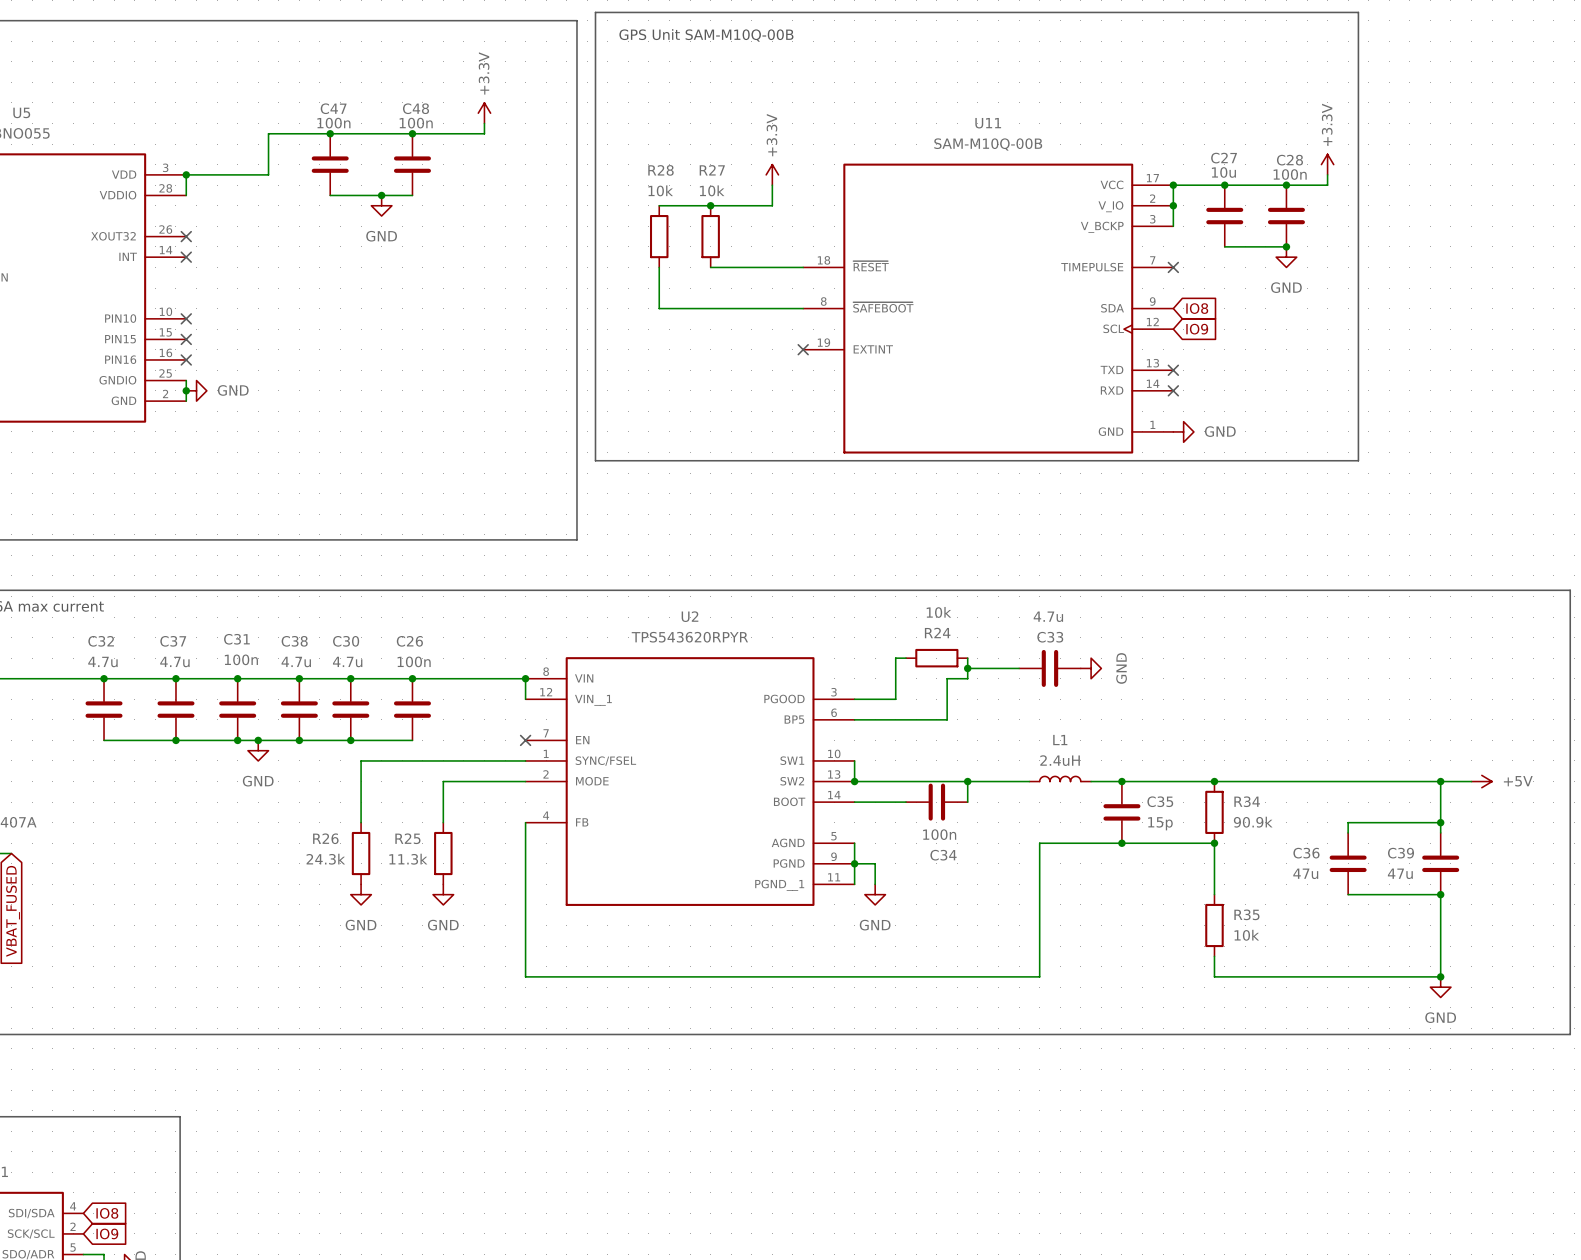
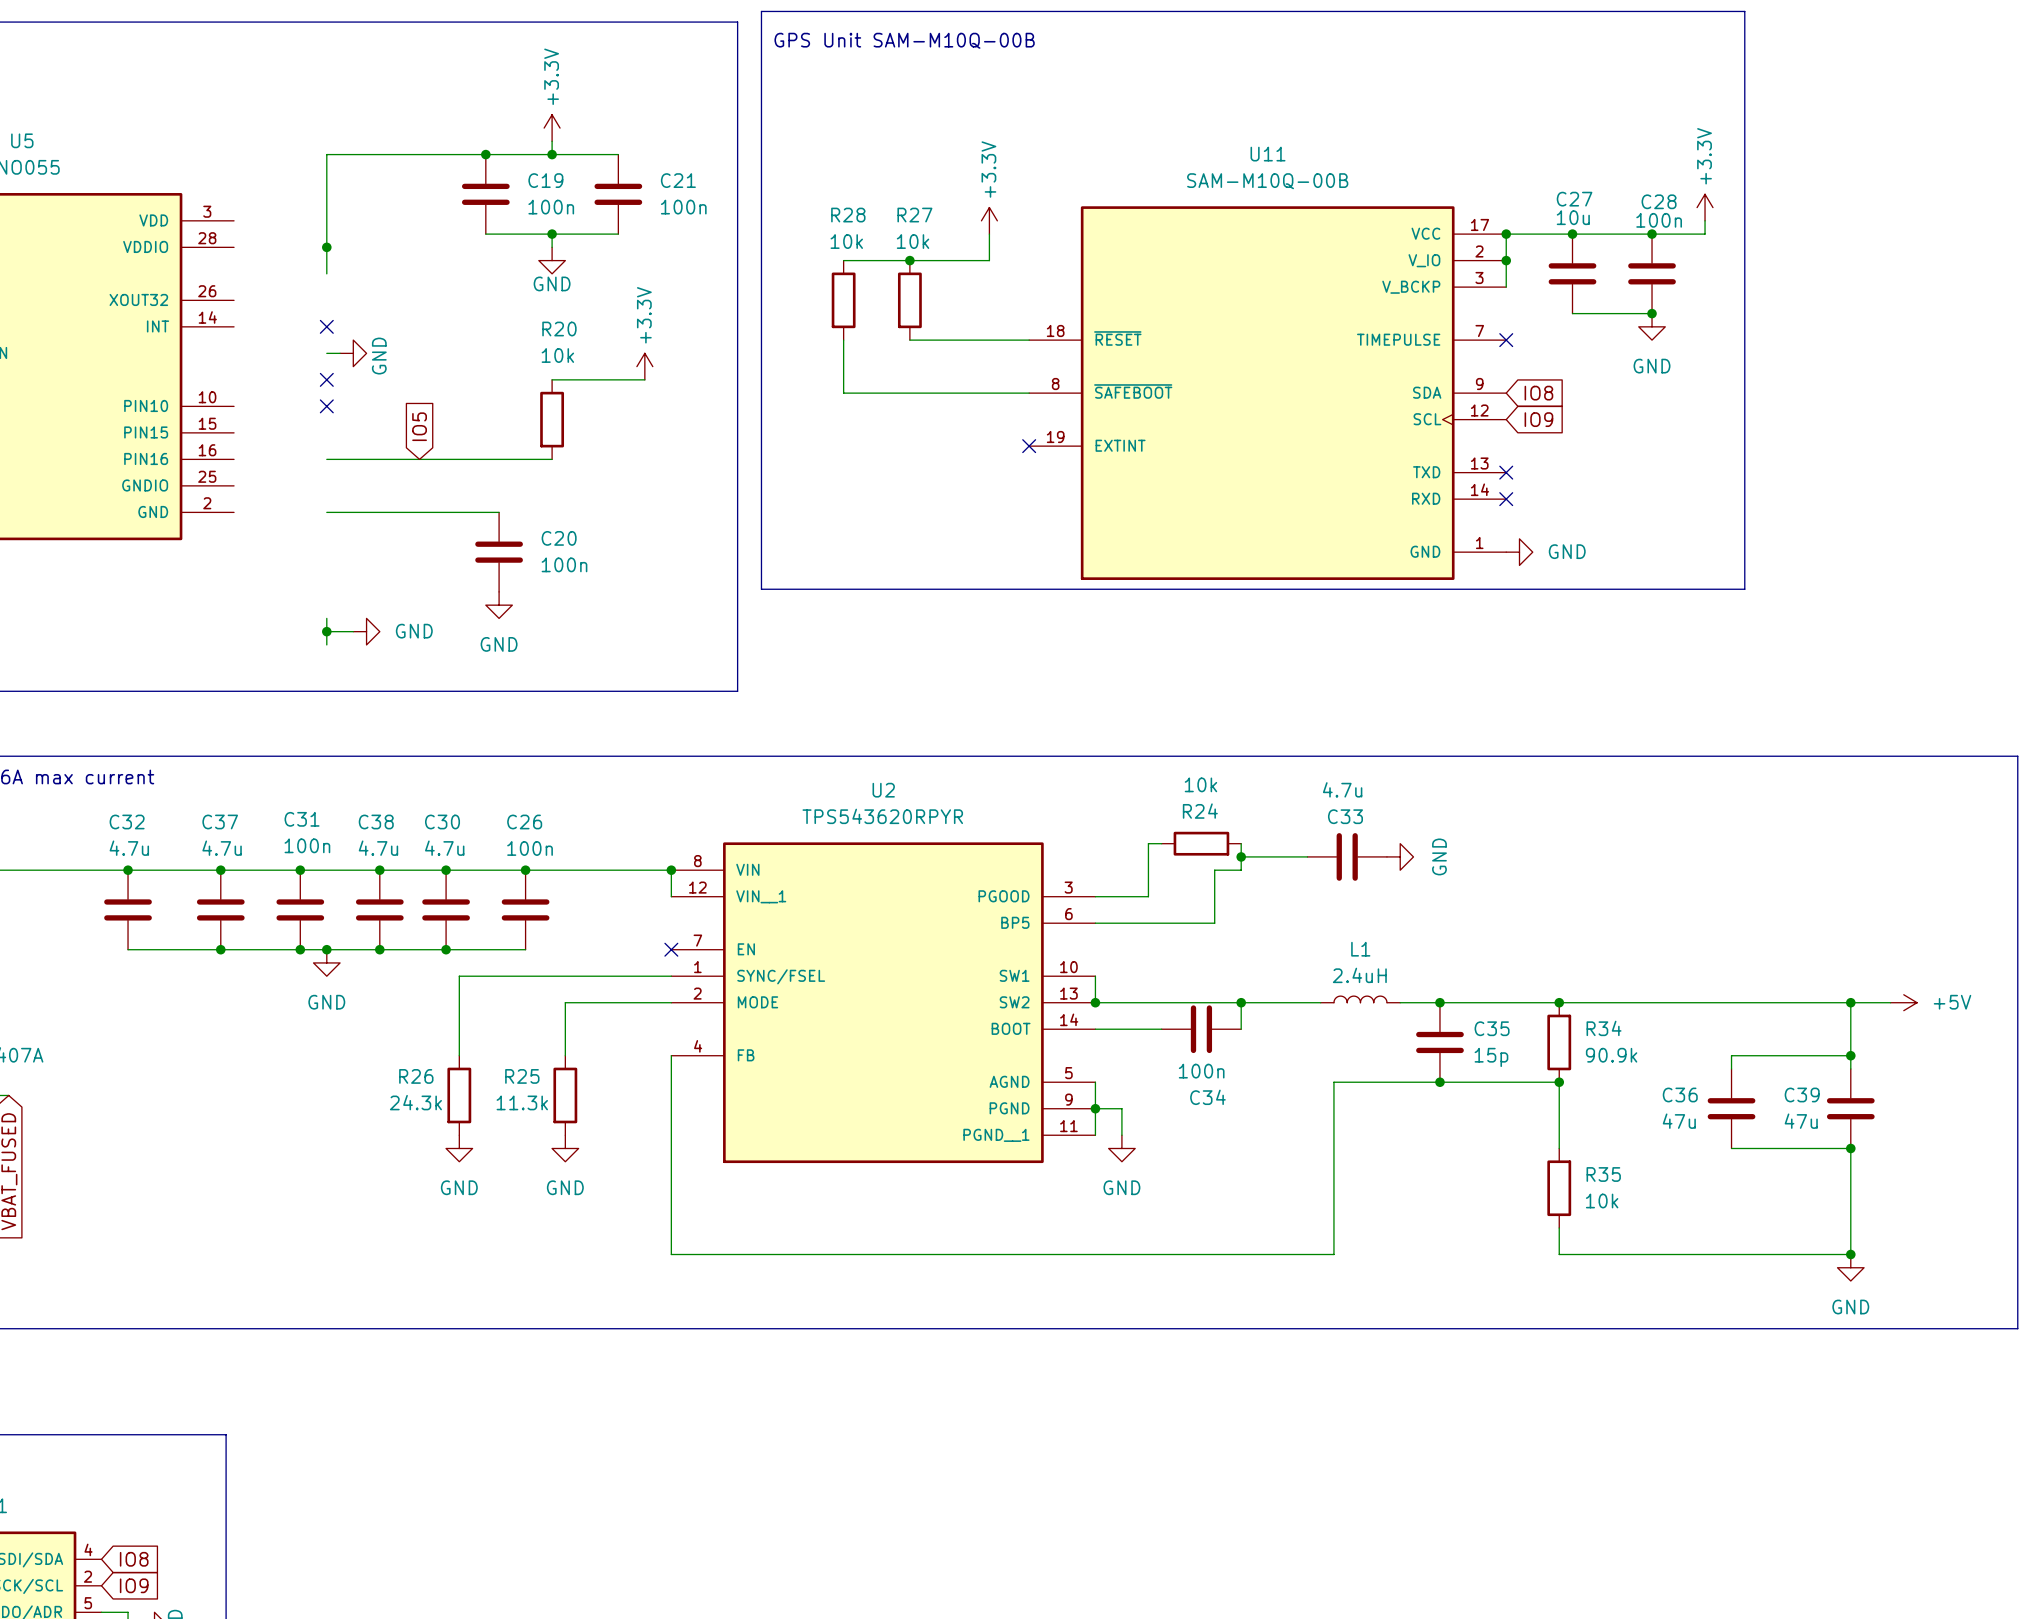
wire: none -> (552, 141) (552, 154)
power symbol position: +3.3V (484, 113) -> +3.3V (552, 128)
junction: none -> (485, 154)
junction: none -> (552, 154)
wire: (484, 123) (484, 133) (268, 133) (268, 174) (186, 174) (186, 195) -> (618, 154) (326, 154) (326, 273)
junction: (330, 133) -> none
junction: (412, 133) -> none
C19: none -> 100n (485, 194)
C21: none -> 100n (618, 194)
C47: 100n (330, 164) -> none
C48: 100n (412, 164) -> none
junction: (186, 174) -> none
wire: none -> (485, 234) (618, 234)
wire: none -> (552, 234) (552, 247)
junction: none -> (552, 234)
junction: none -> (326, 247)
wire: (330, 195) (412, 195) -> none
junction: (381, 195) -> none
power symbol position: GND (381, 205) -> GND (552, 260)
no-connect mark: (186, 236) -> none
power symbol text position: GND (381, 236) -> GND (552, 283)
no-connect mark: (186, 257) -> none
no-connect mark: none -> (326, 326)
wire: none -> (326, 353) (340, 353)
power symbol: none -> GND (353, 353)
power symbol: none -> +3.3V (644, 366)
no-connect mark: none -> (326, 379)
wire: none -> (552, 379) (644, 379)
no-connect mark: (186, 318) -> none
no-connect mark: none -> (326, 406)
R20: none -> 10k (552, 419)
global label: none -> IO5 (419, 426)
no-connect mark: (186, 339) -> none
no-connect mark: (186, 359) -> none
wire: none -> (326, 459) (552, 459)
wire: (186, 380) (186, 401) -> (326, 618) (326, 644)
junction: (186, 390) -> none
power symbol: GND (196, 390) -> none
wire: none -> (326, 512) (499, 512)
C20: none -> 100n (499, 552)
power symbol: none -> GND (499, 605)
wire: none -> (326, 631) (353, 631)
junction: none -> (326, 631)
power symbol: none -> GND (366, 631)

